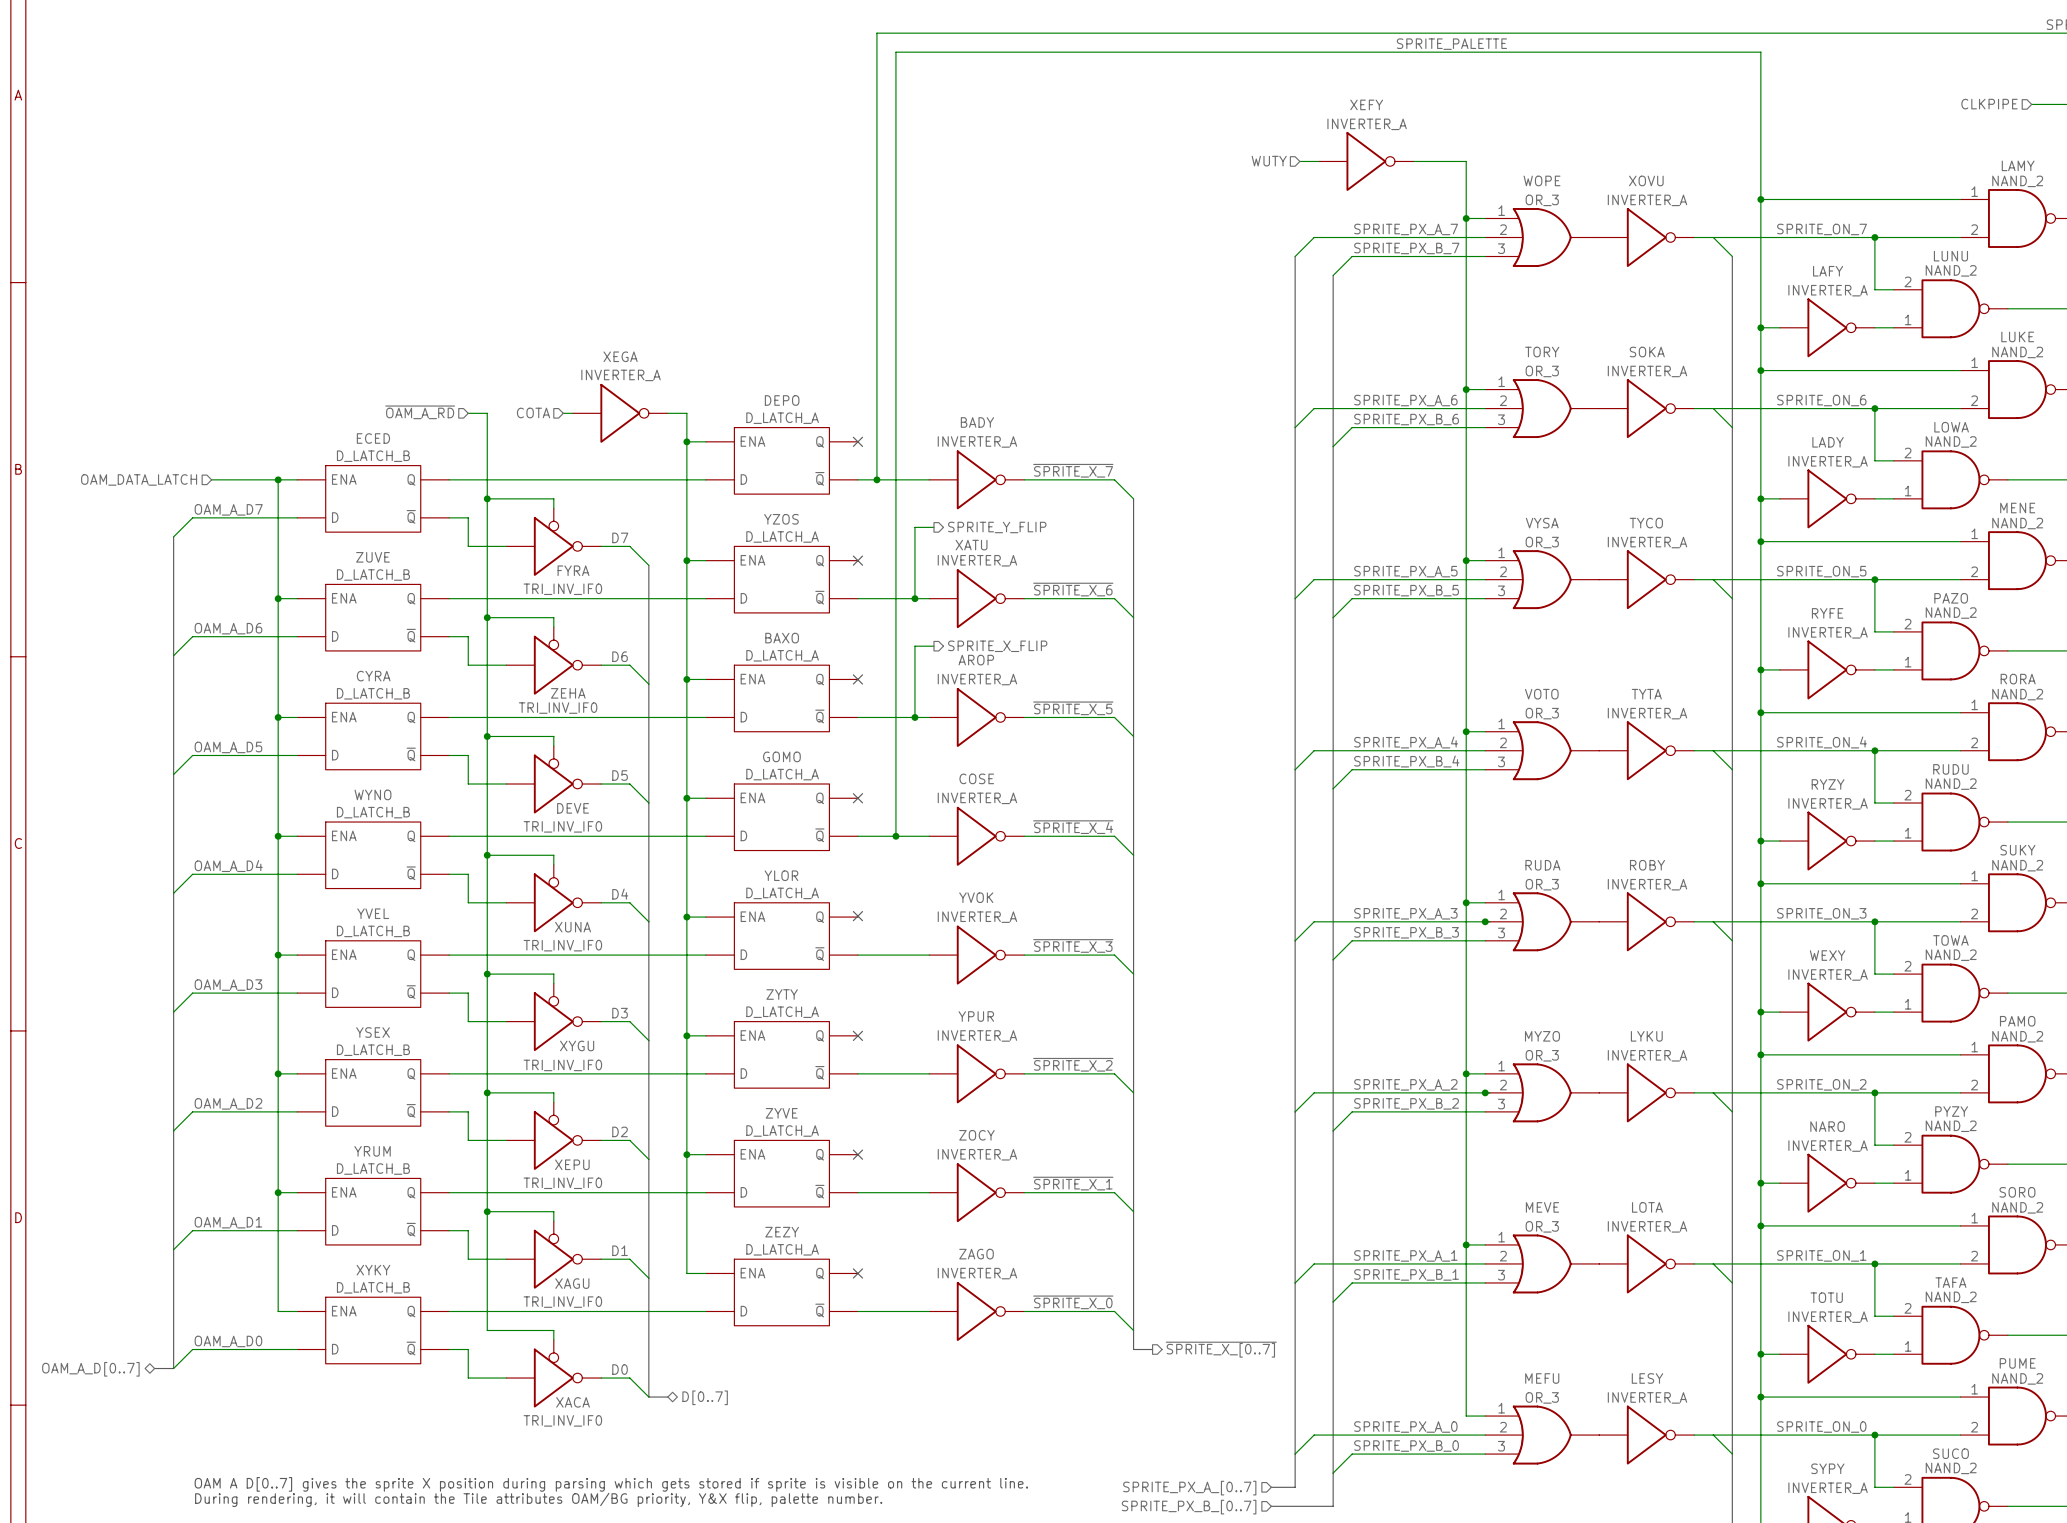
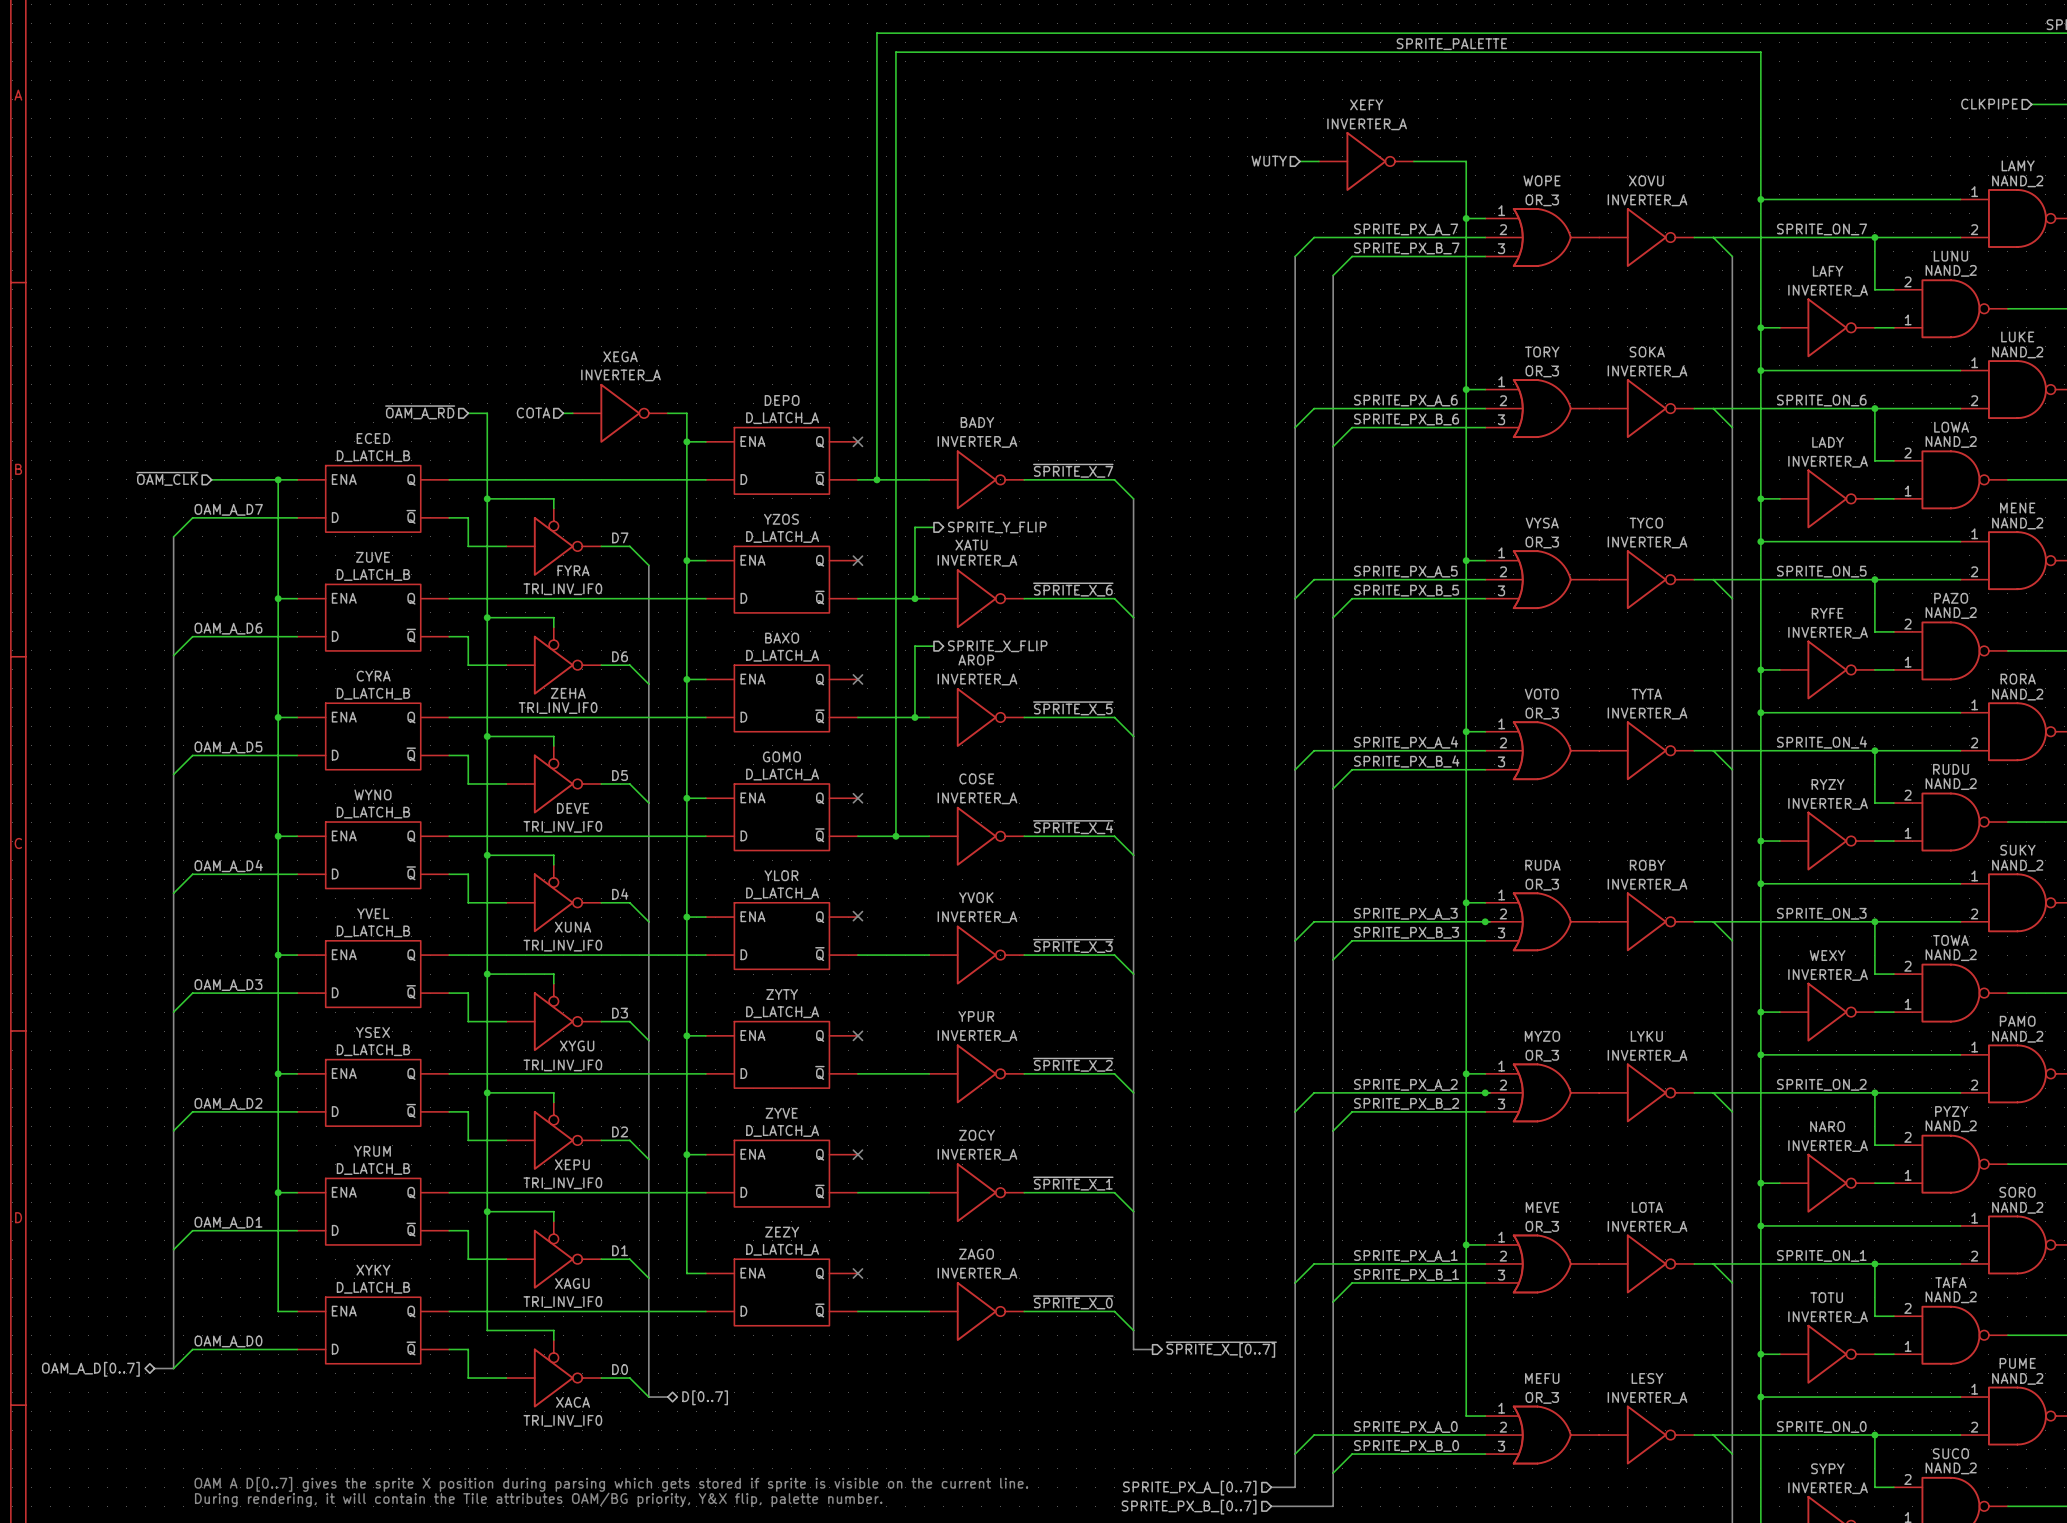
hierarchical label: OAM_DATA_LATCH (139, 479) -> ~{OAM_CLK} (167, 478)

